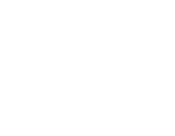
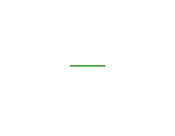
wire: none -> (70, 65) (105, 65)

